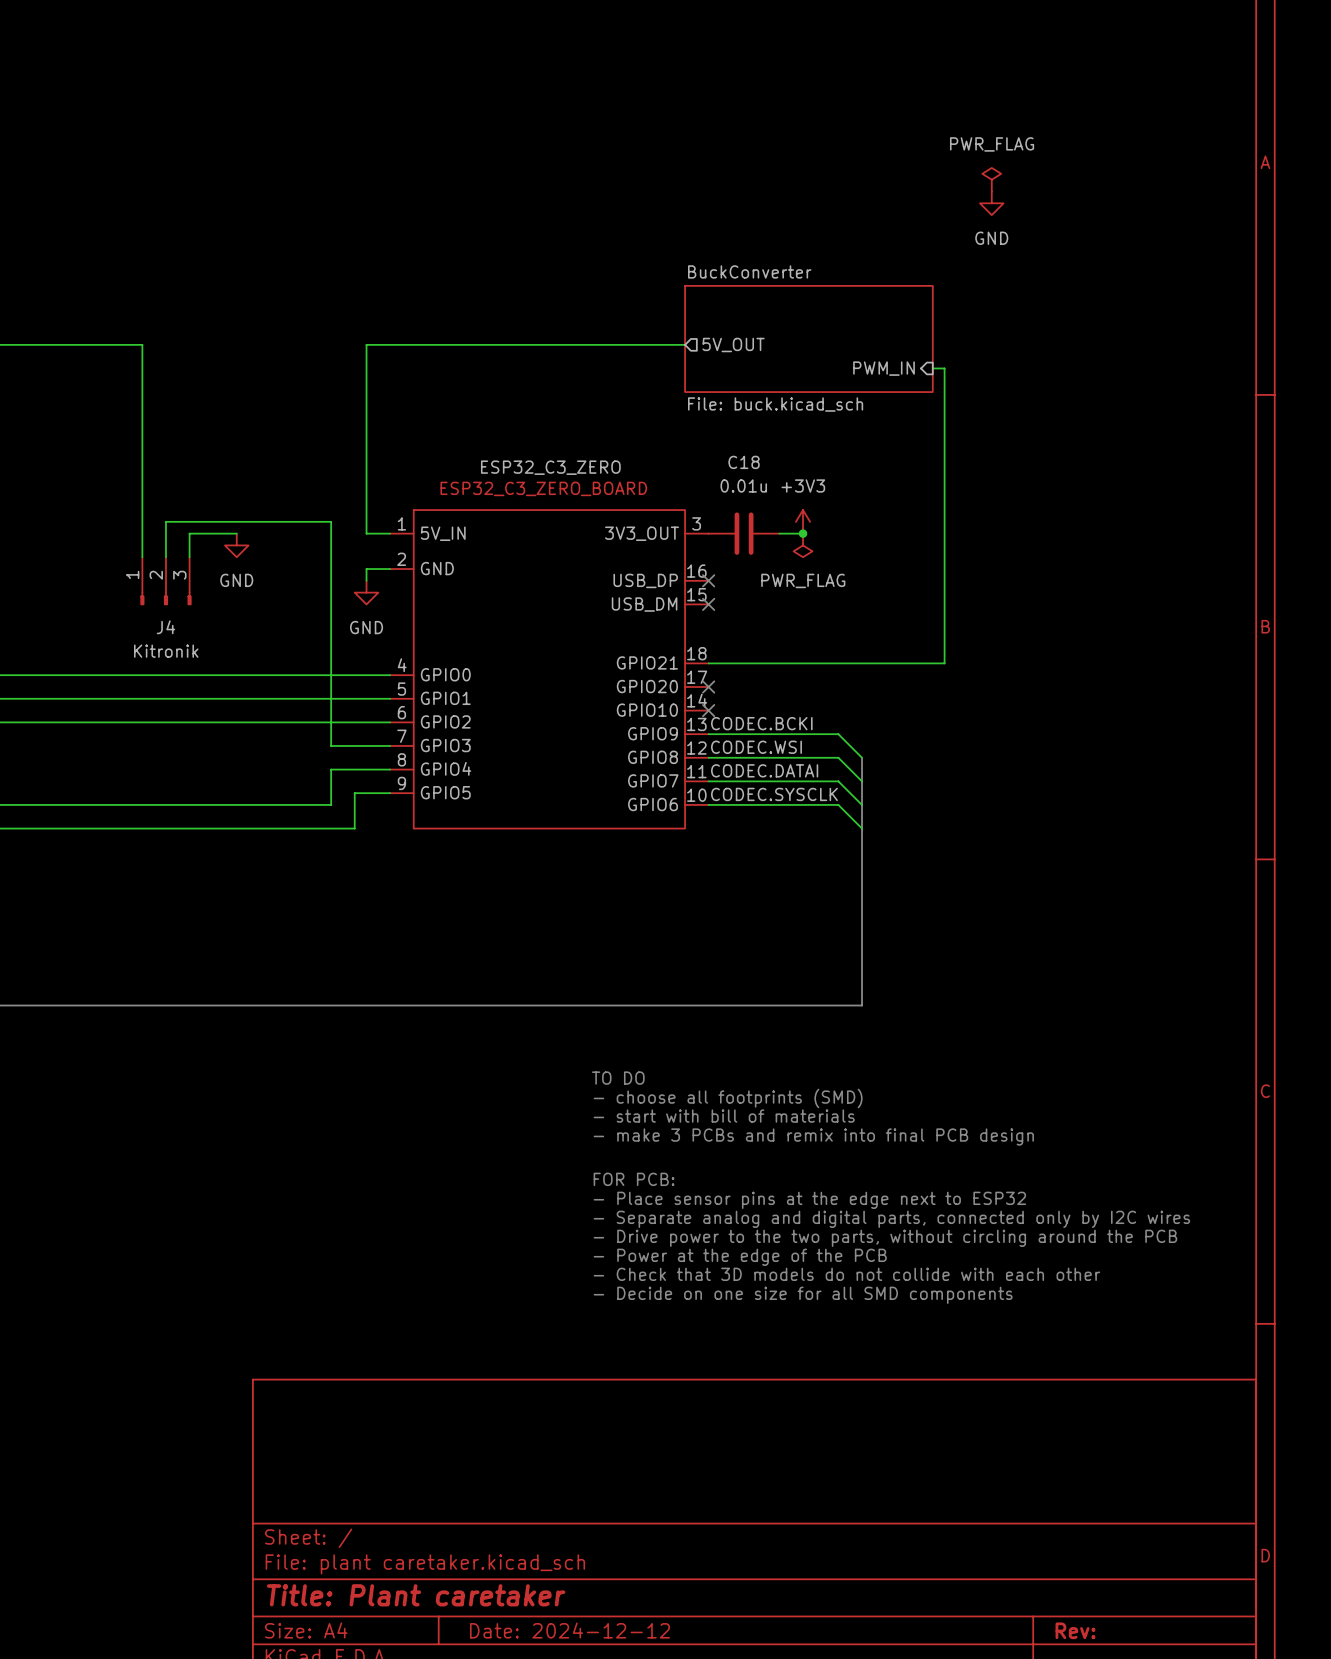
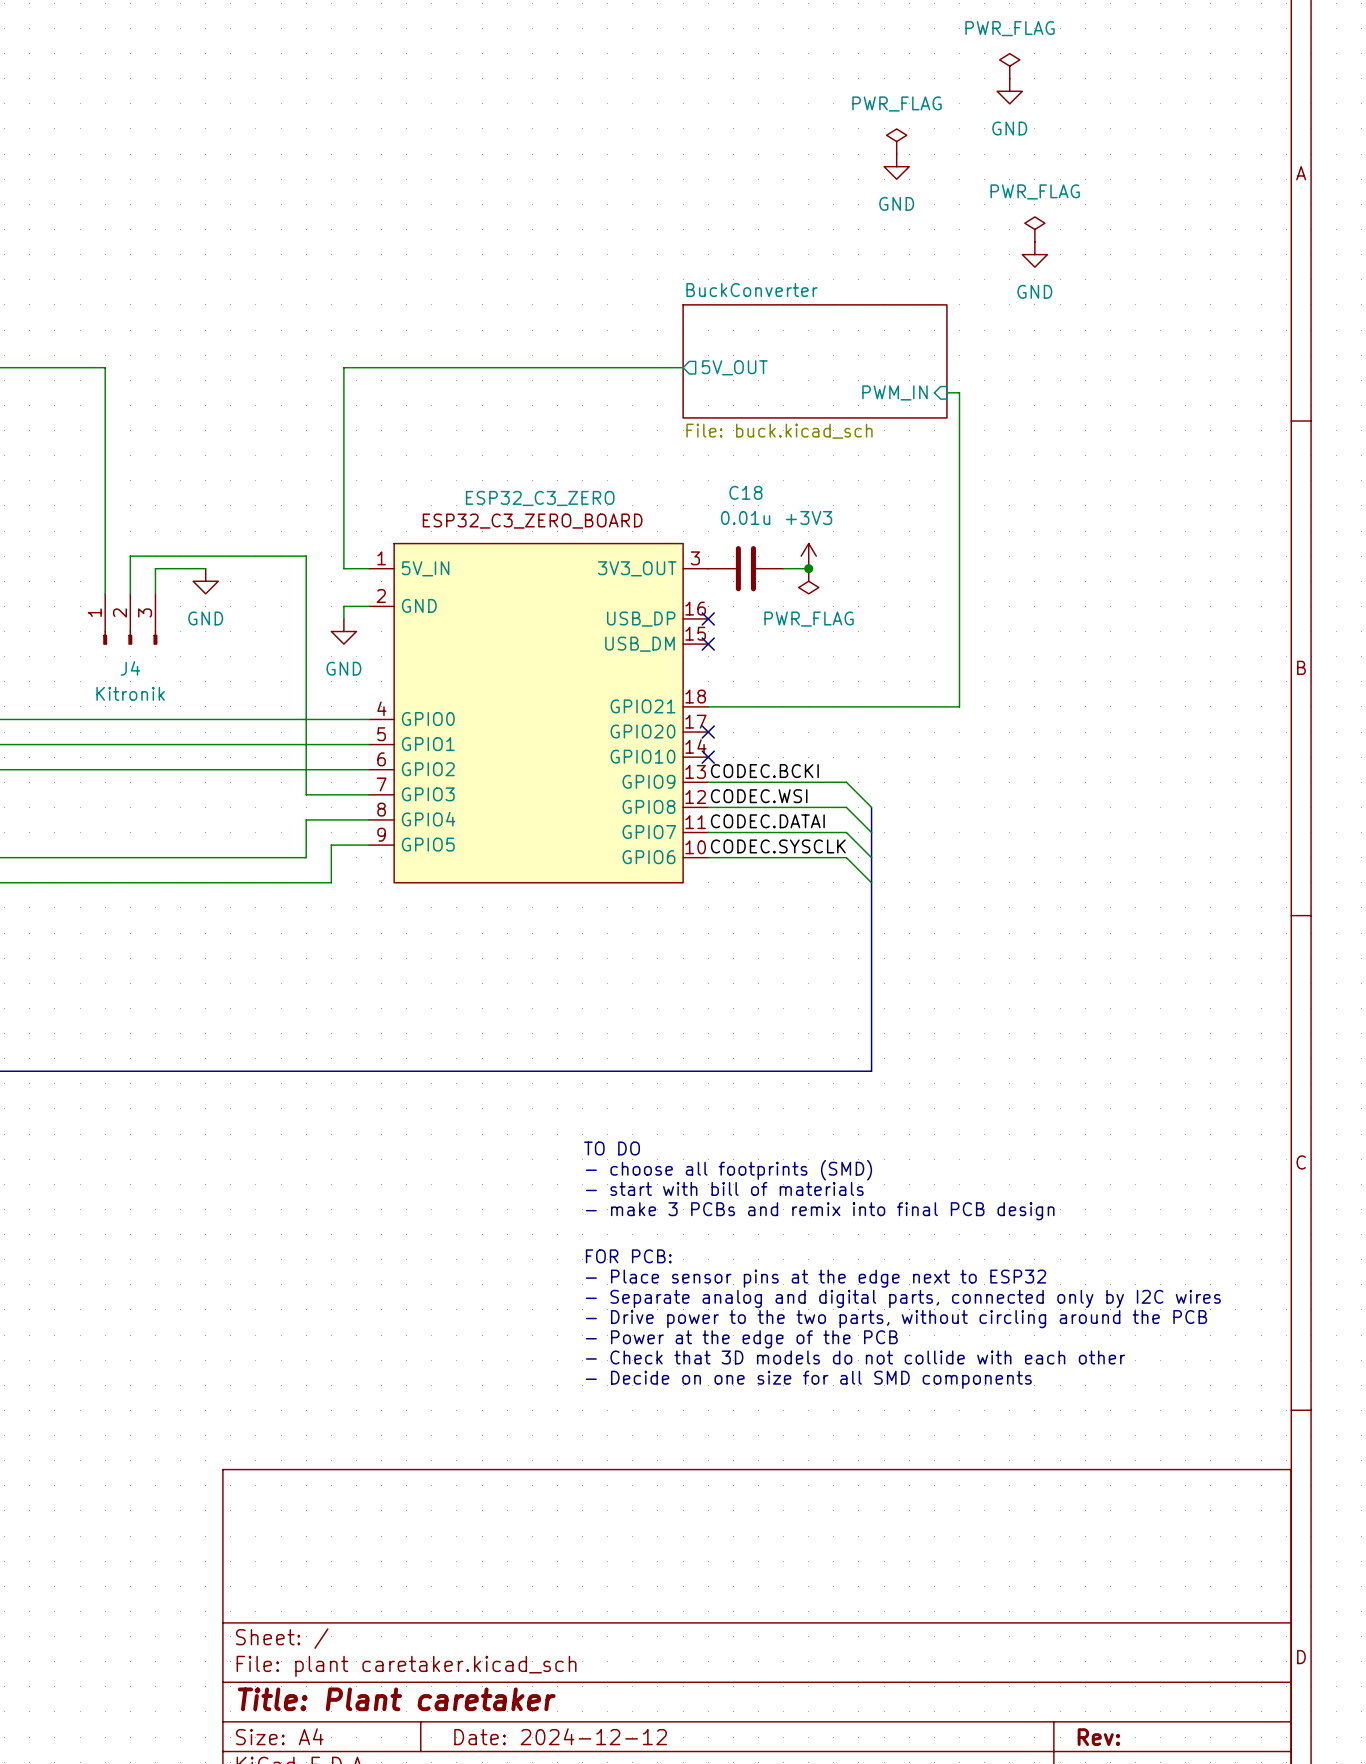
power symbol: none -> PWR_FLAG (1009, 66)
power symbol: none -> GND (1009, 91)
power symbol: none -> PWR_FLAG (896, 141)
power symbol: none -> GND (896, 166)
power symbol position: PWR_FLAG (991, 179) -> PWR_FLAG (1034, 229)
power symbol position: GND (991, 203) -> GND (1034, 254)

